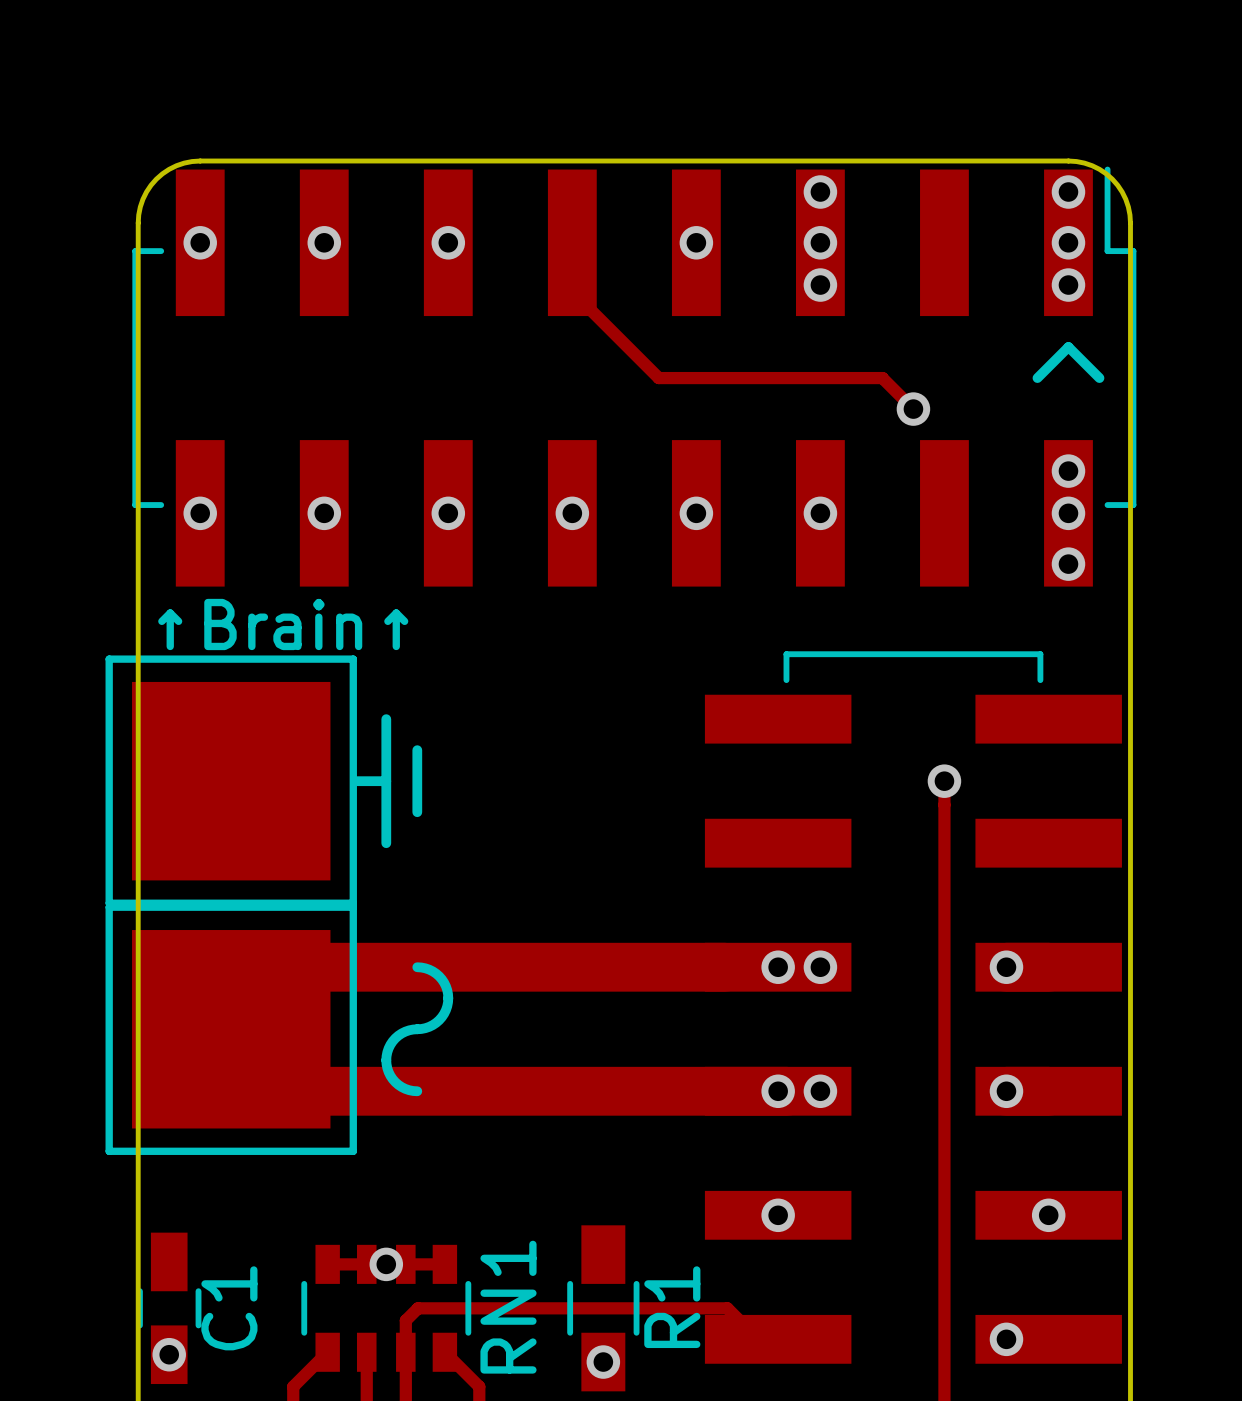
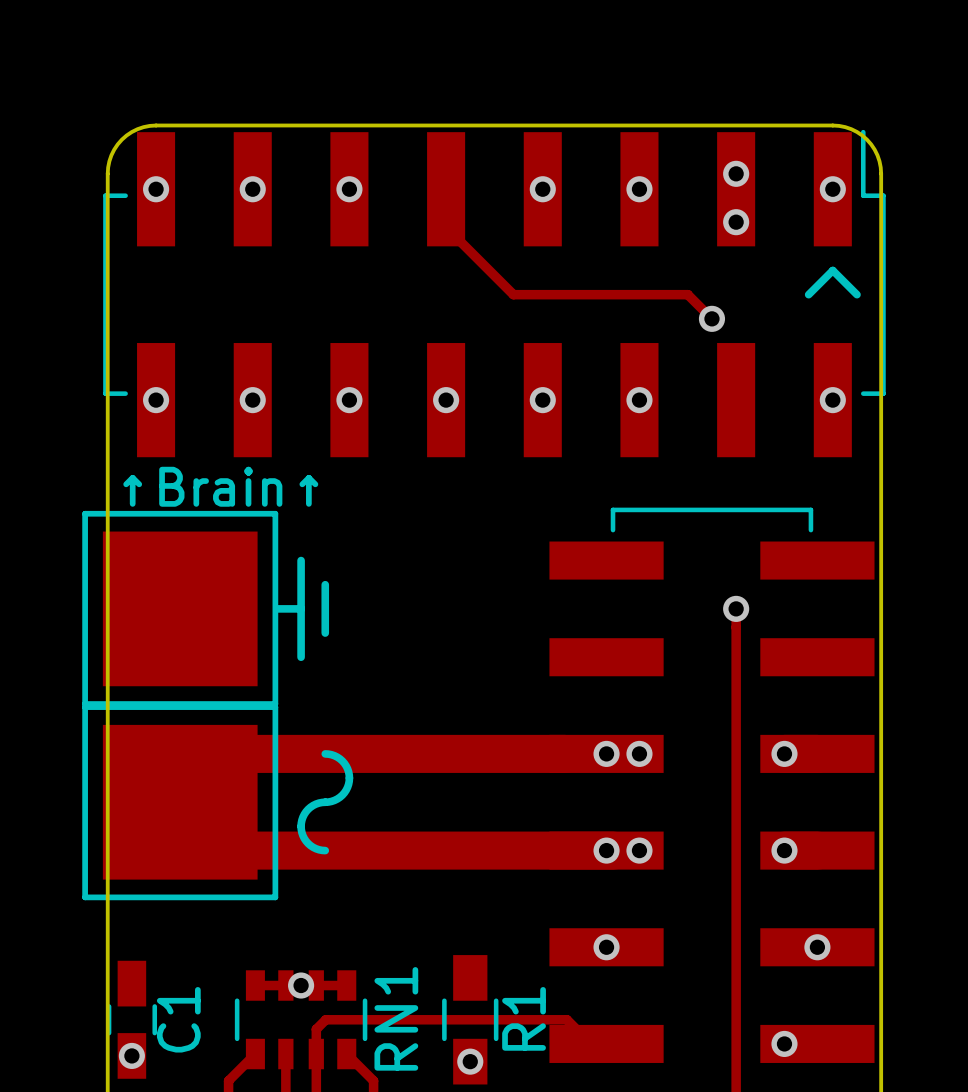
via: (820, 192) -> none
via: (1068, 192) -> none
via: none -> (736, 173)
via: (820, 285) -> none
via: none -> (736, 222)
via: (1068, 285) -> none
via: (1068, 471) -> none
via: (1068, 564) -> none

